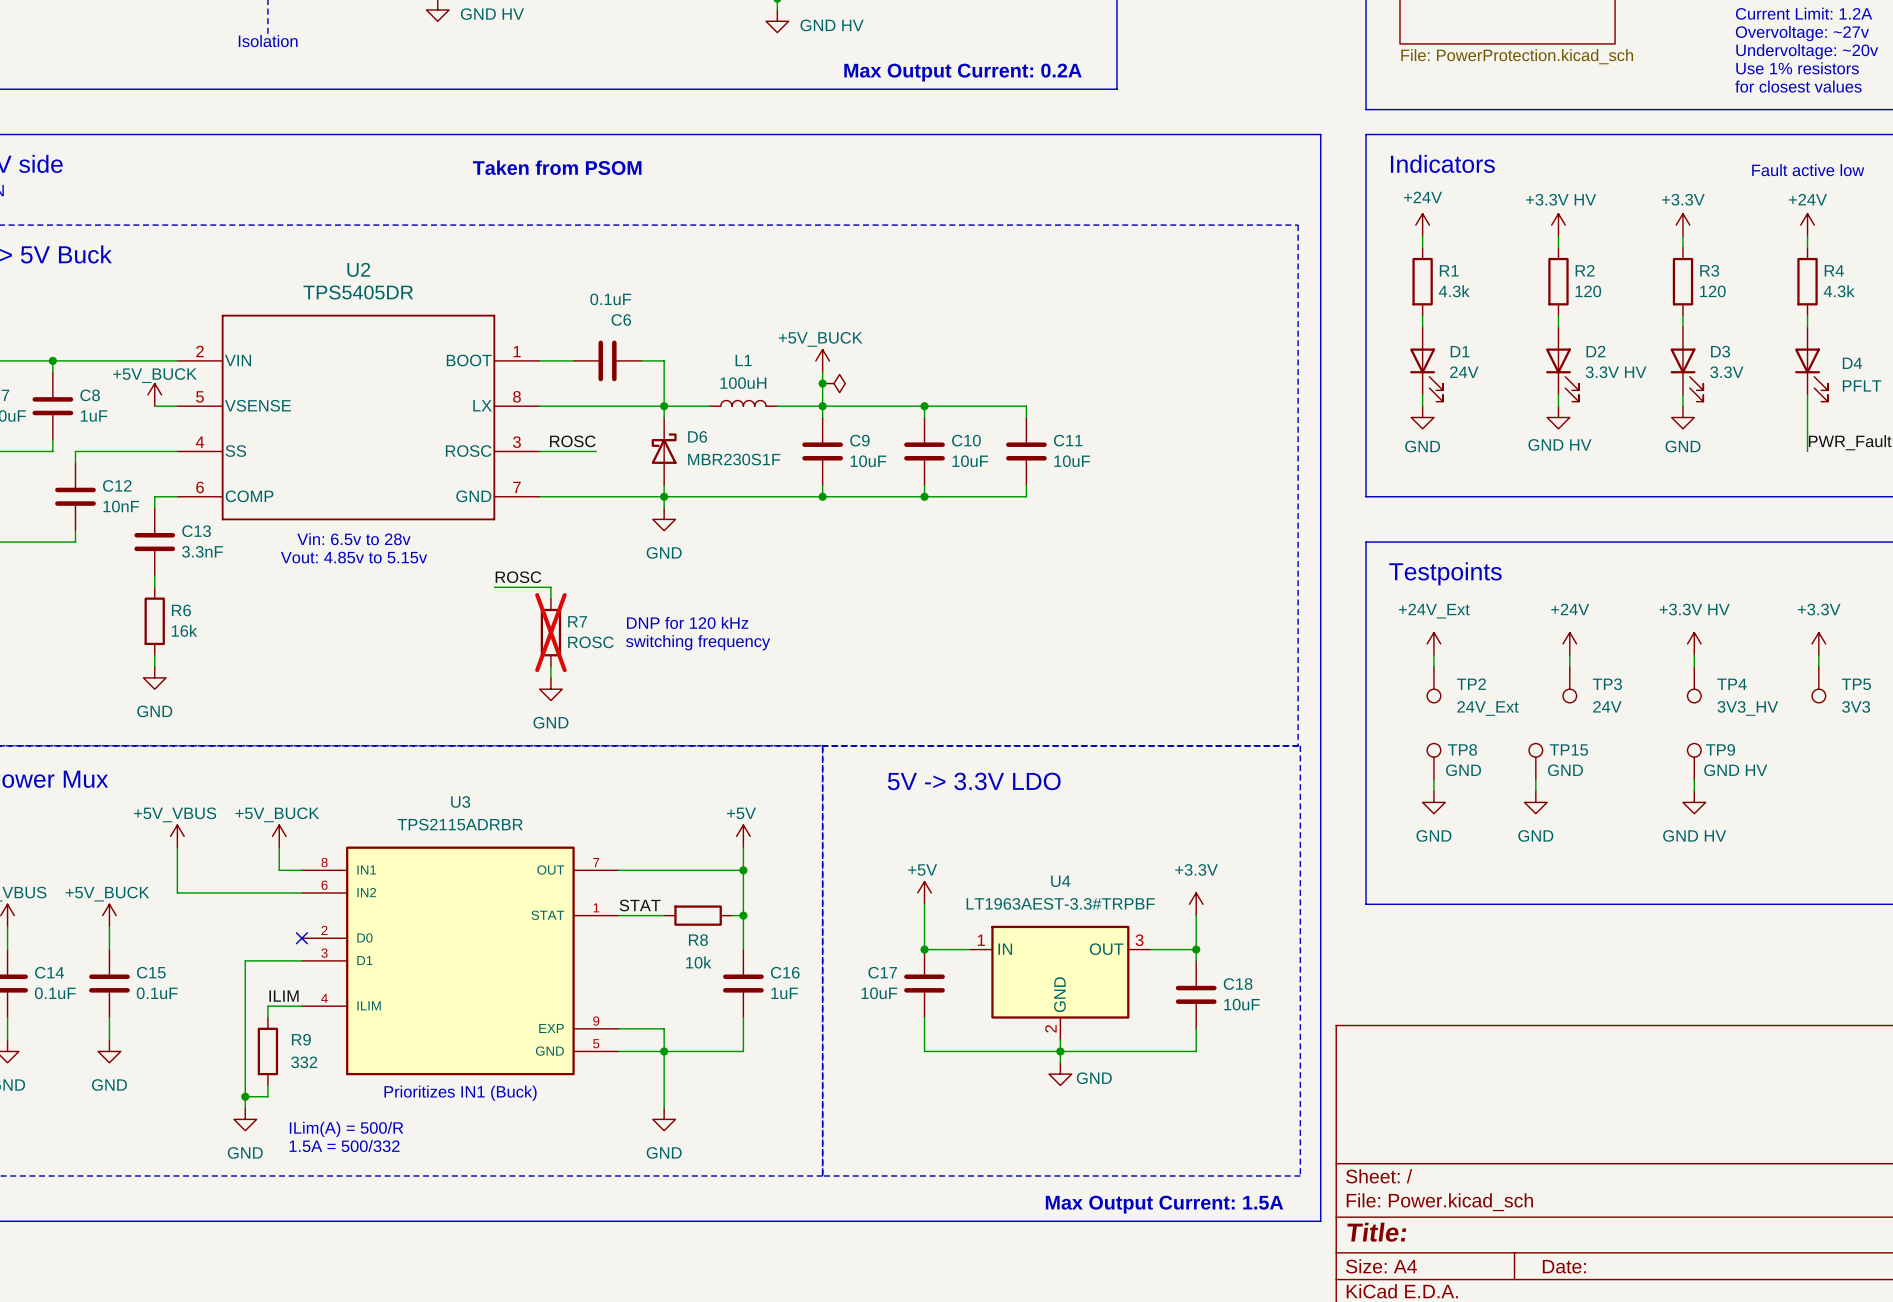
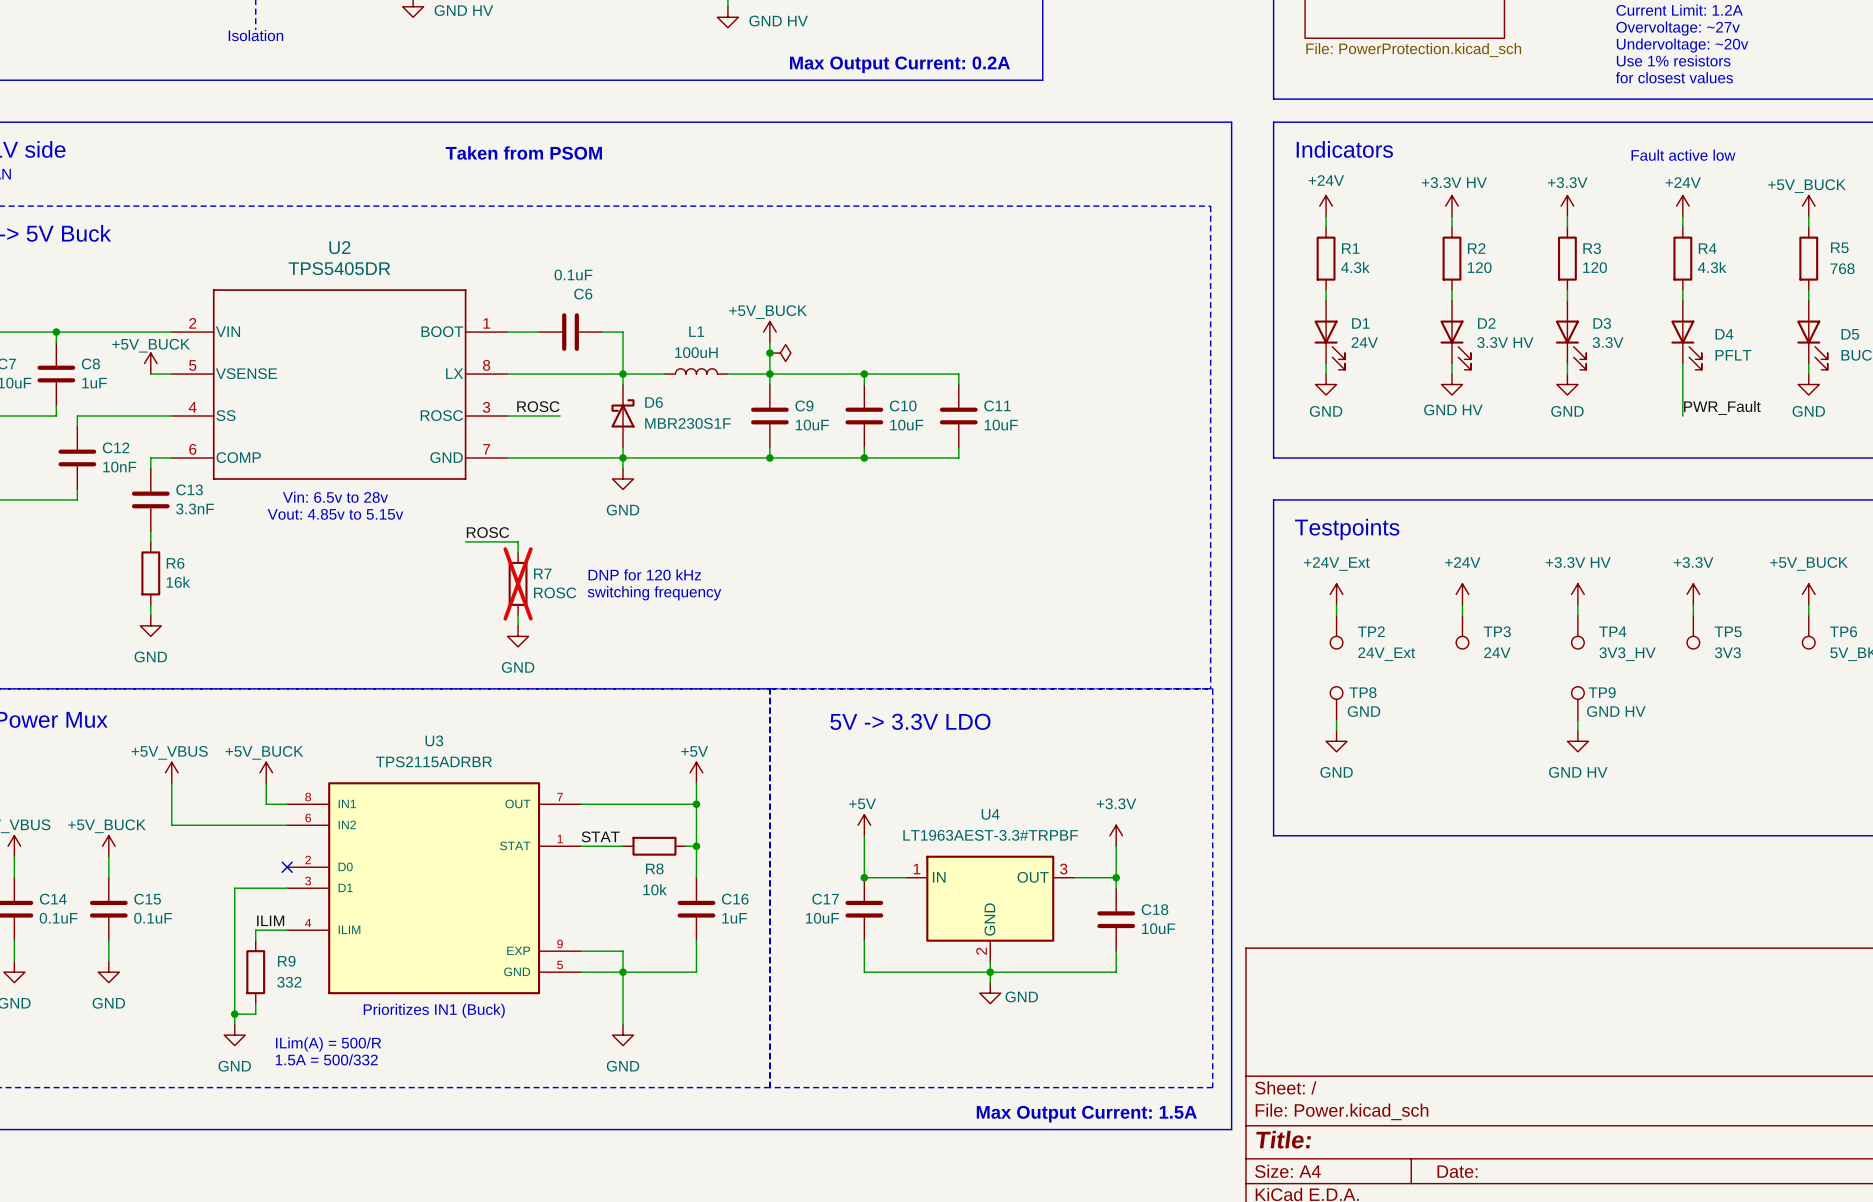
TP15: GND (1535, 761) -> none
wire: (1535, 779) (1535, 791) -> none
power symbol: GND (1535, 802) -> none

